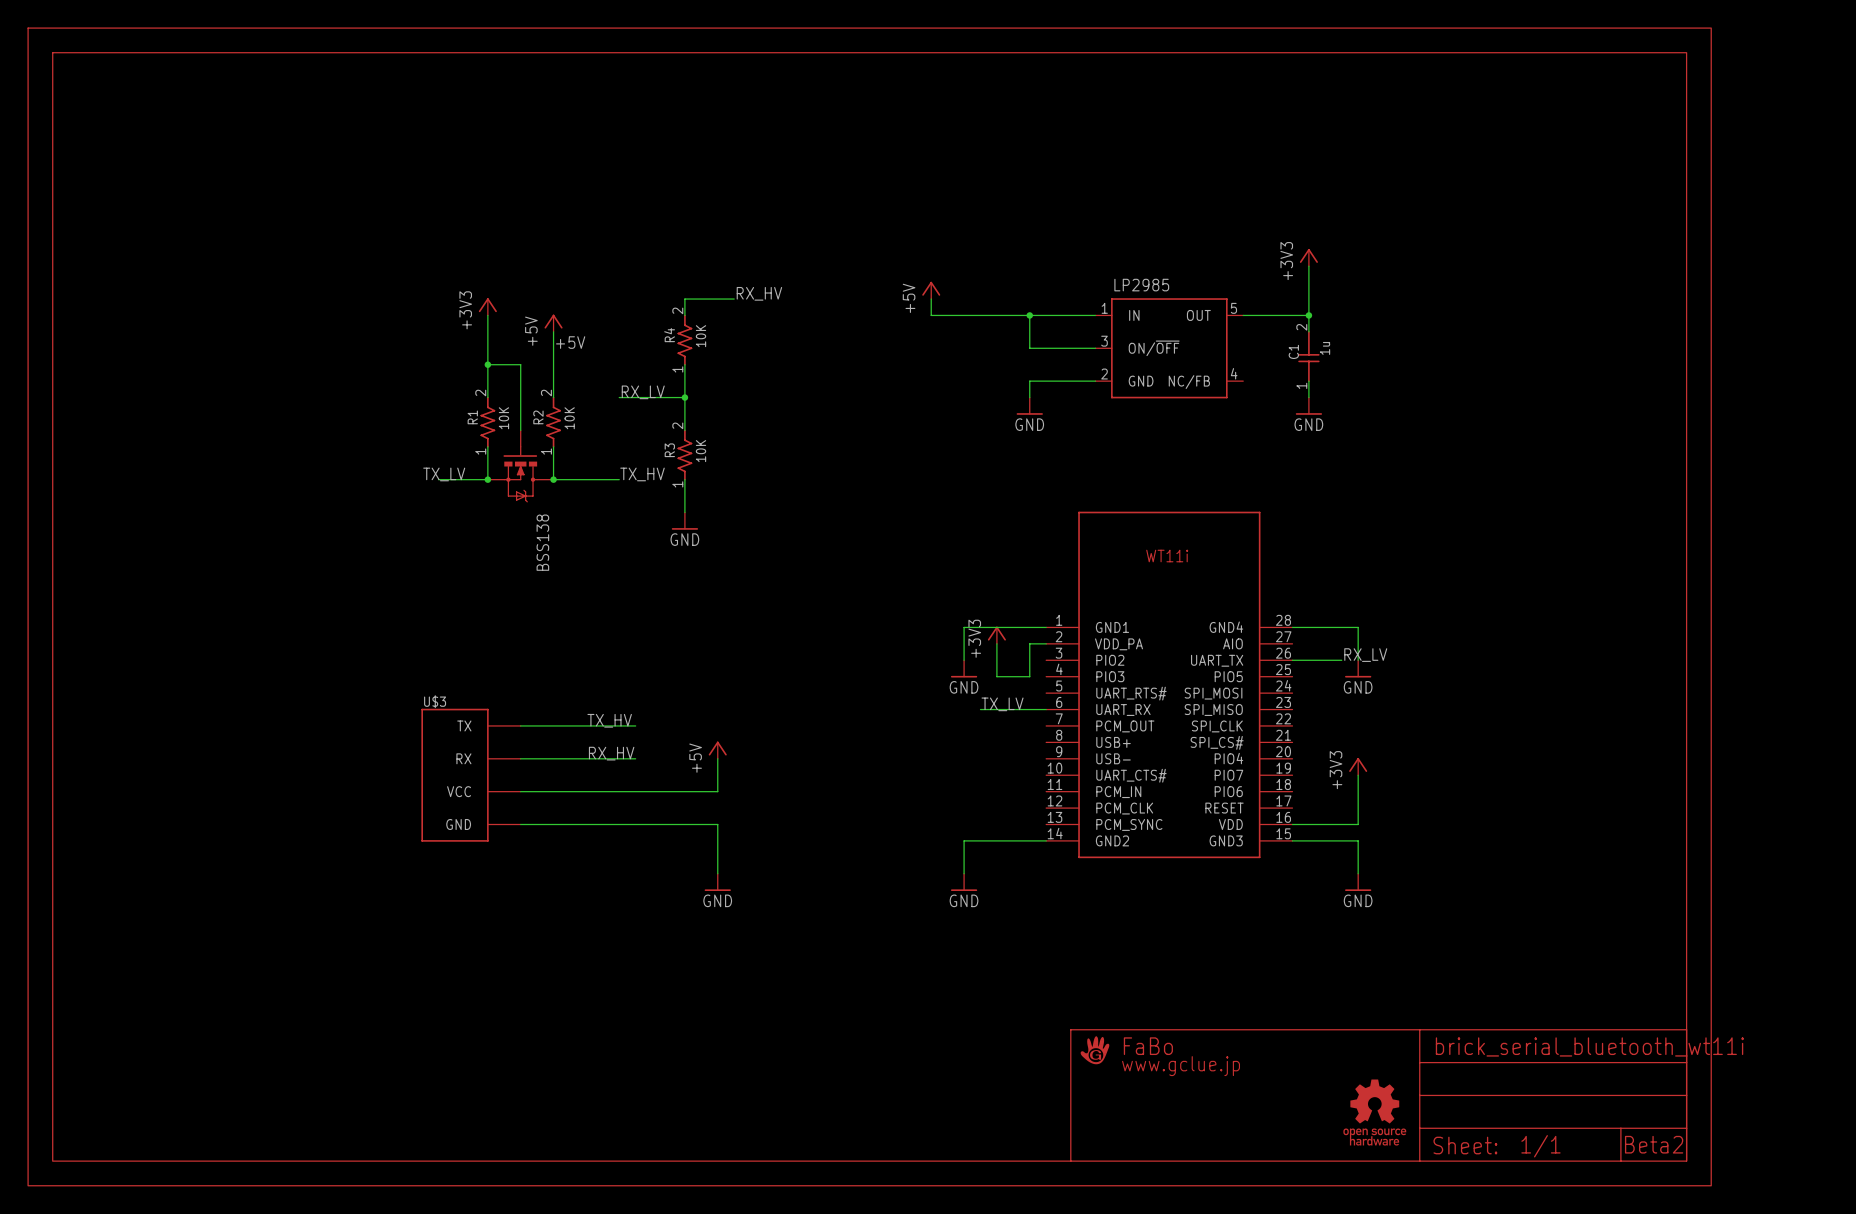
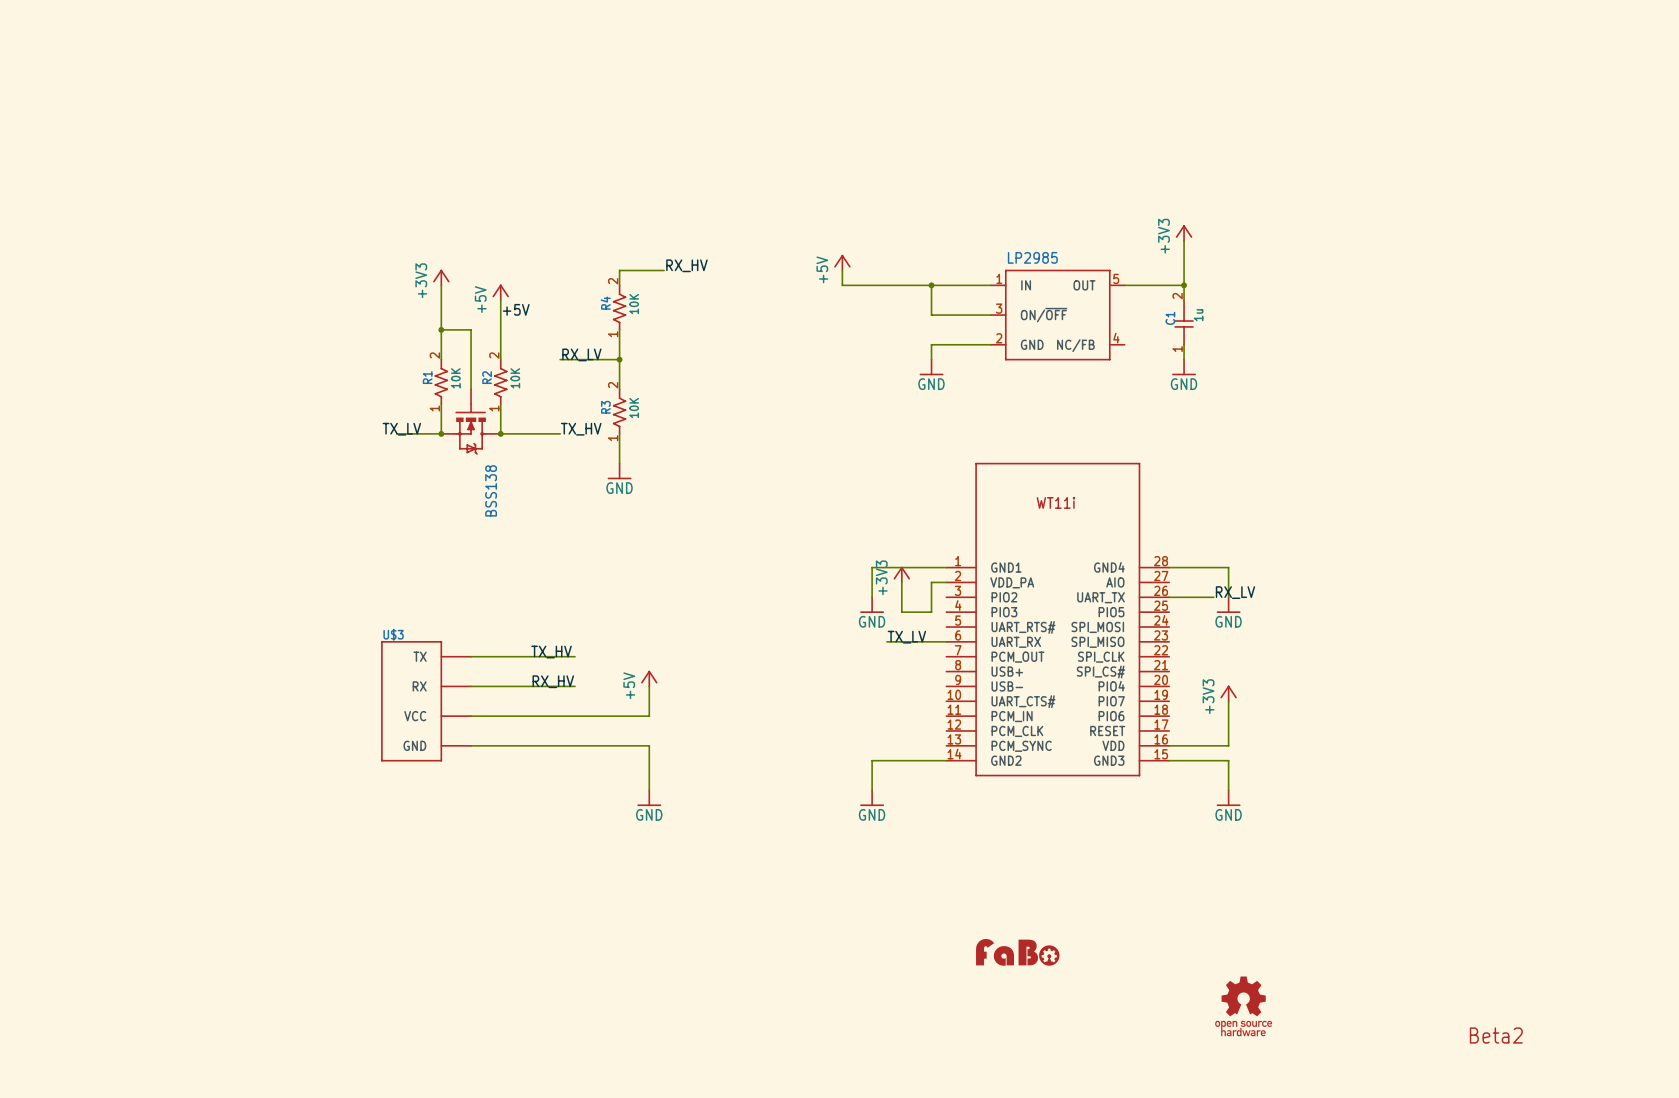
part: (869, 606) -> none
part: none -> (1017, 952)

